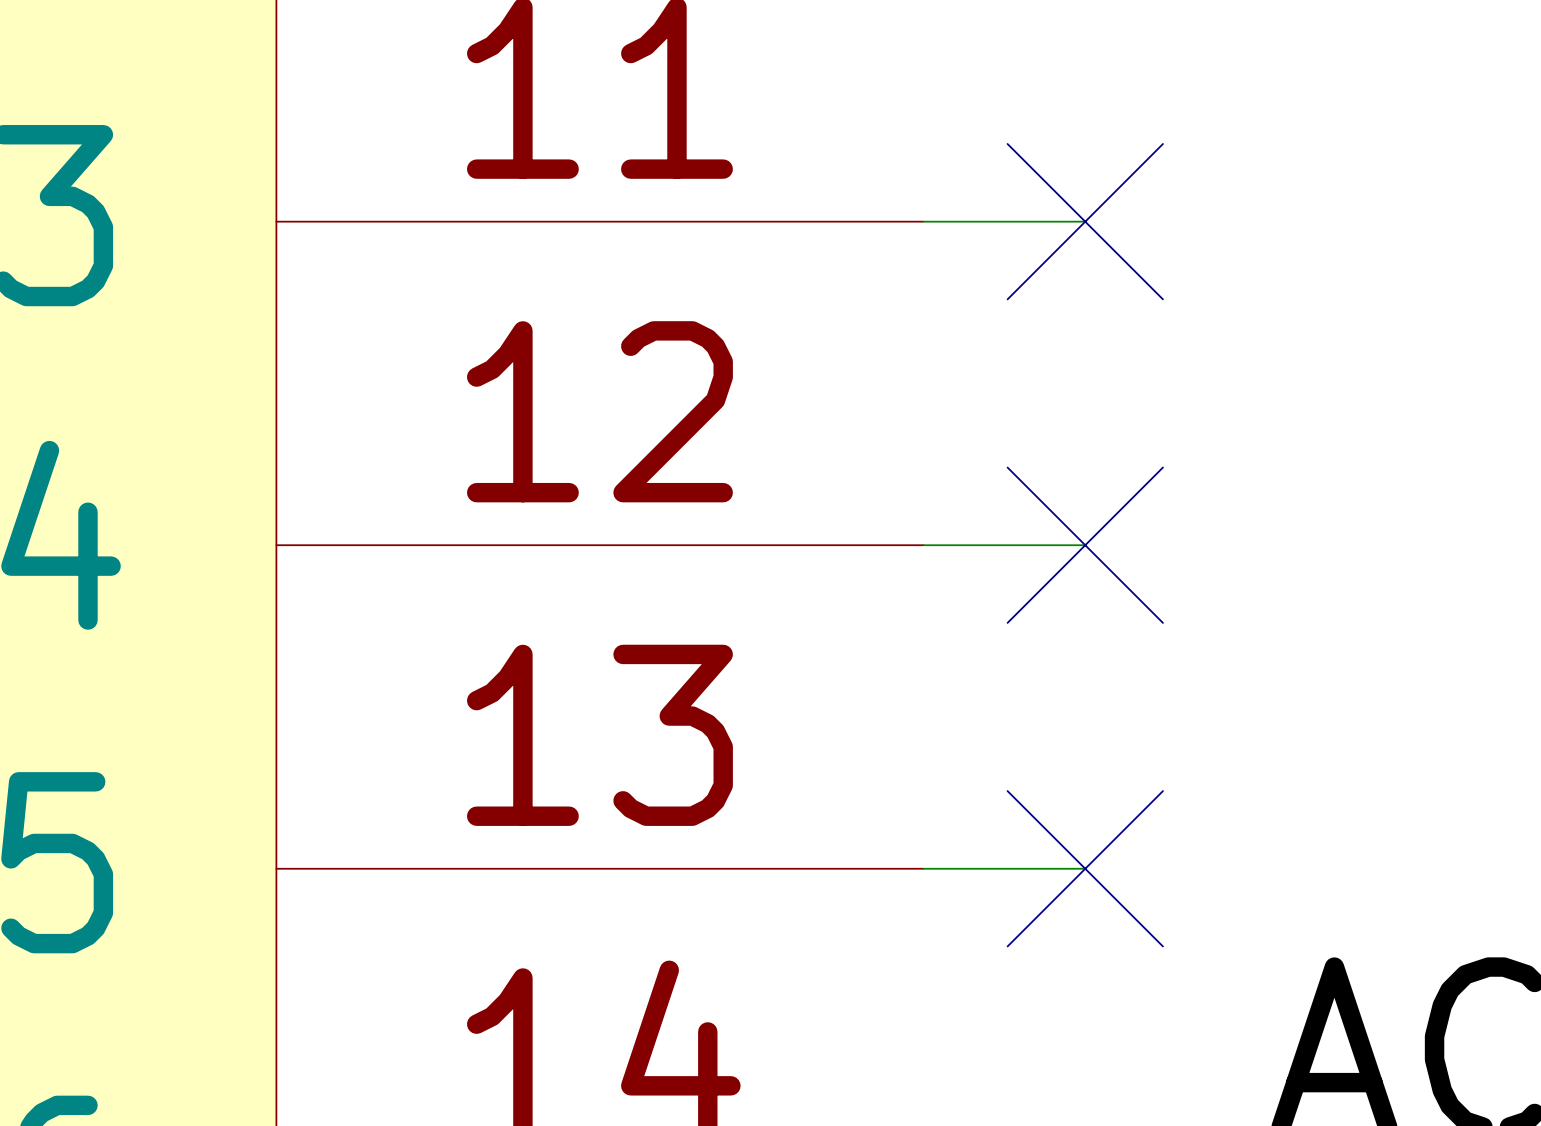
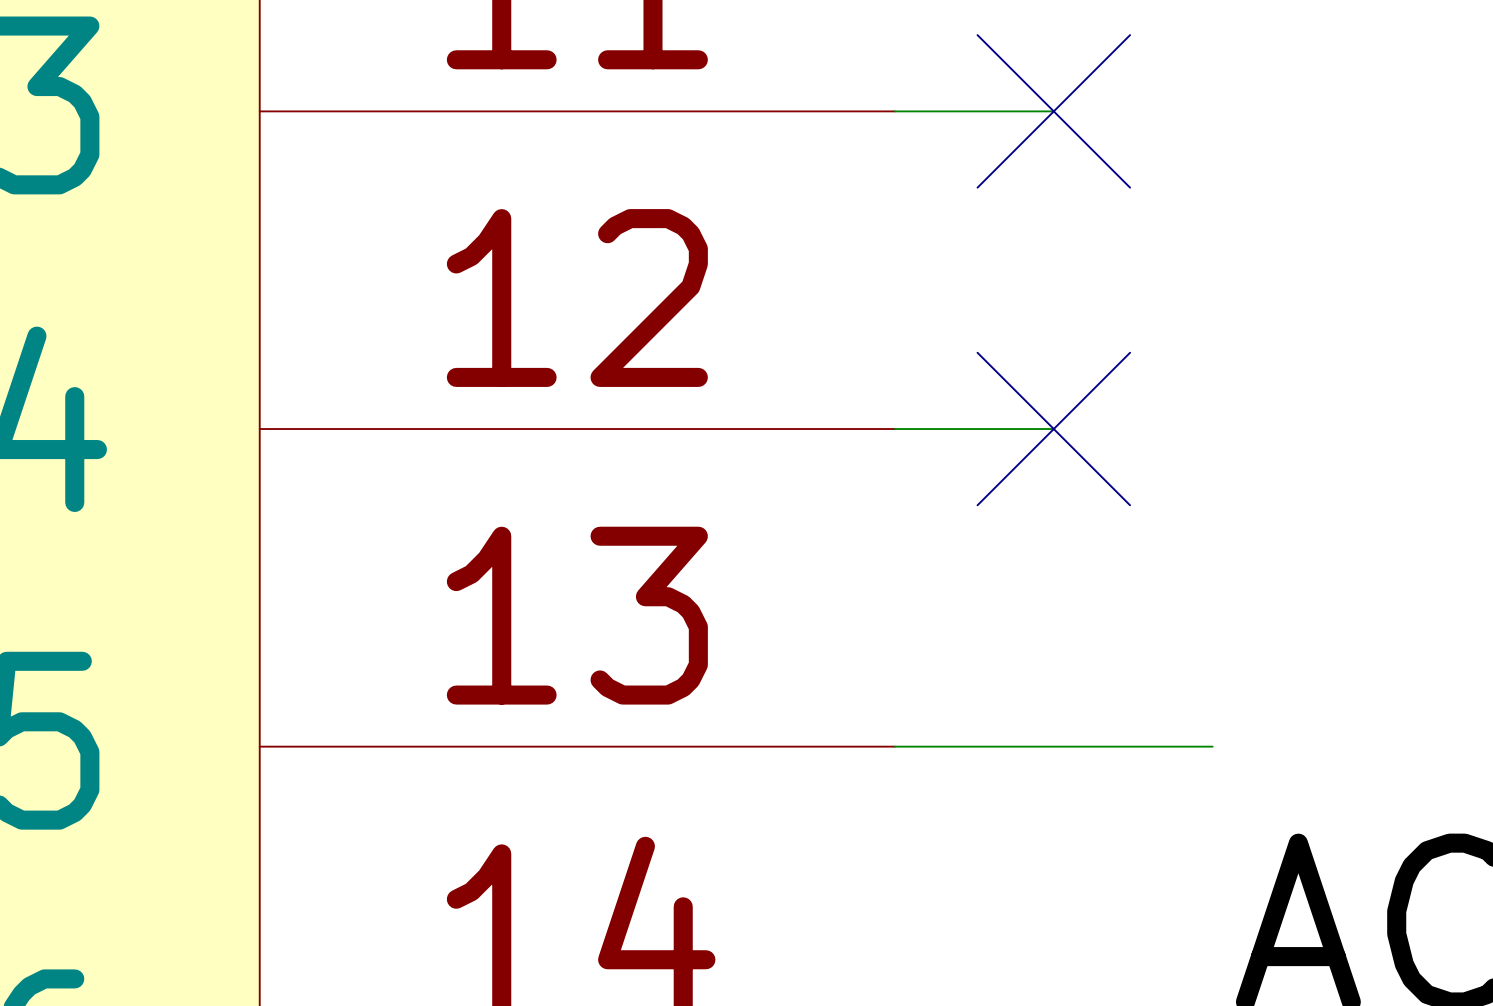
wire: none -> (1053, 746) (1212, 746)
no-connect mark: (1085, 868) -> none

